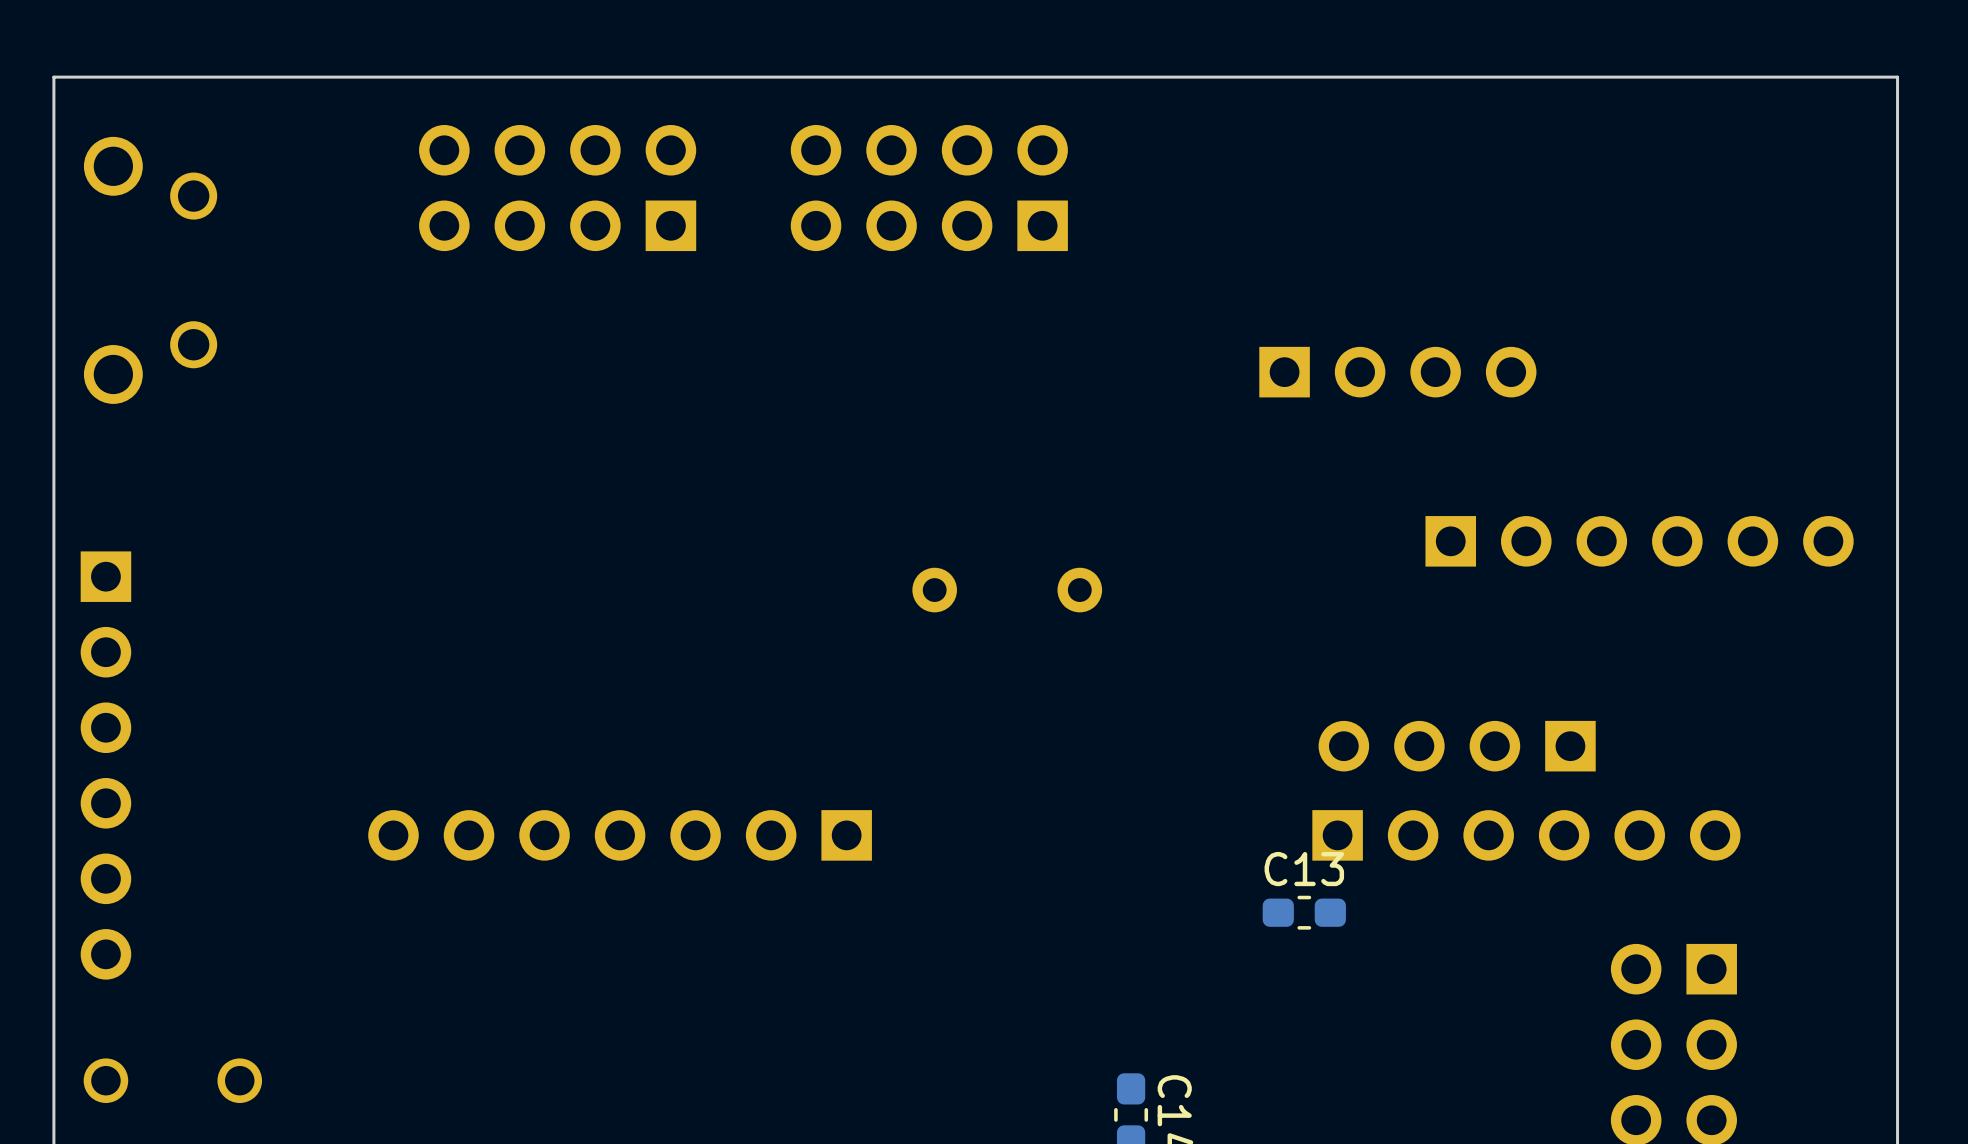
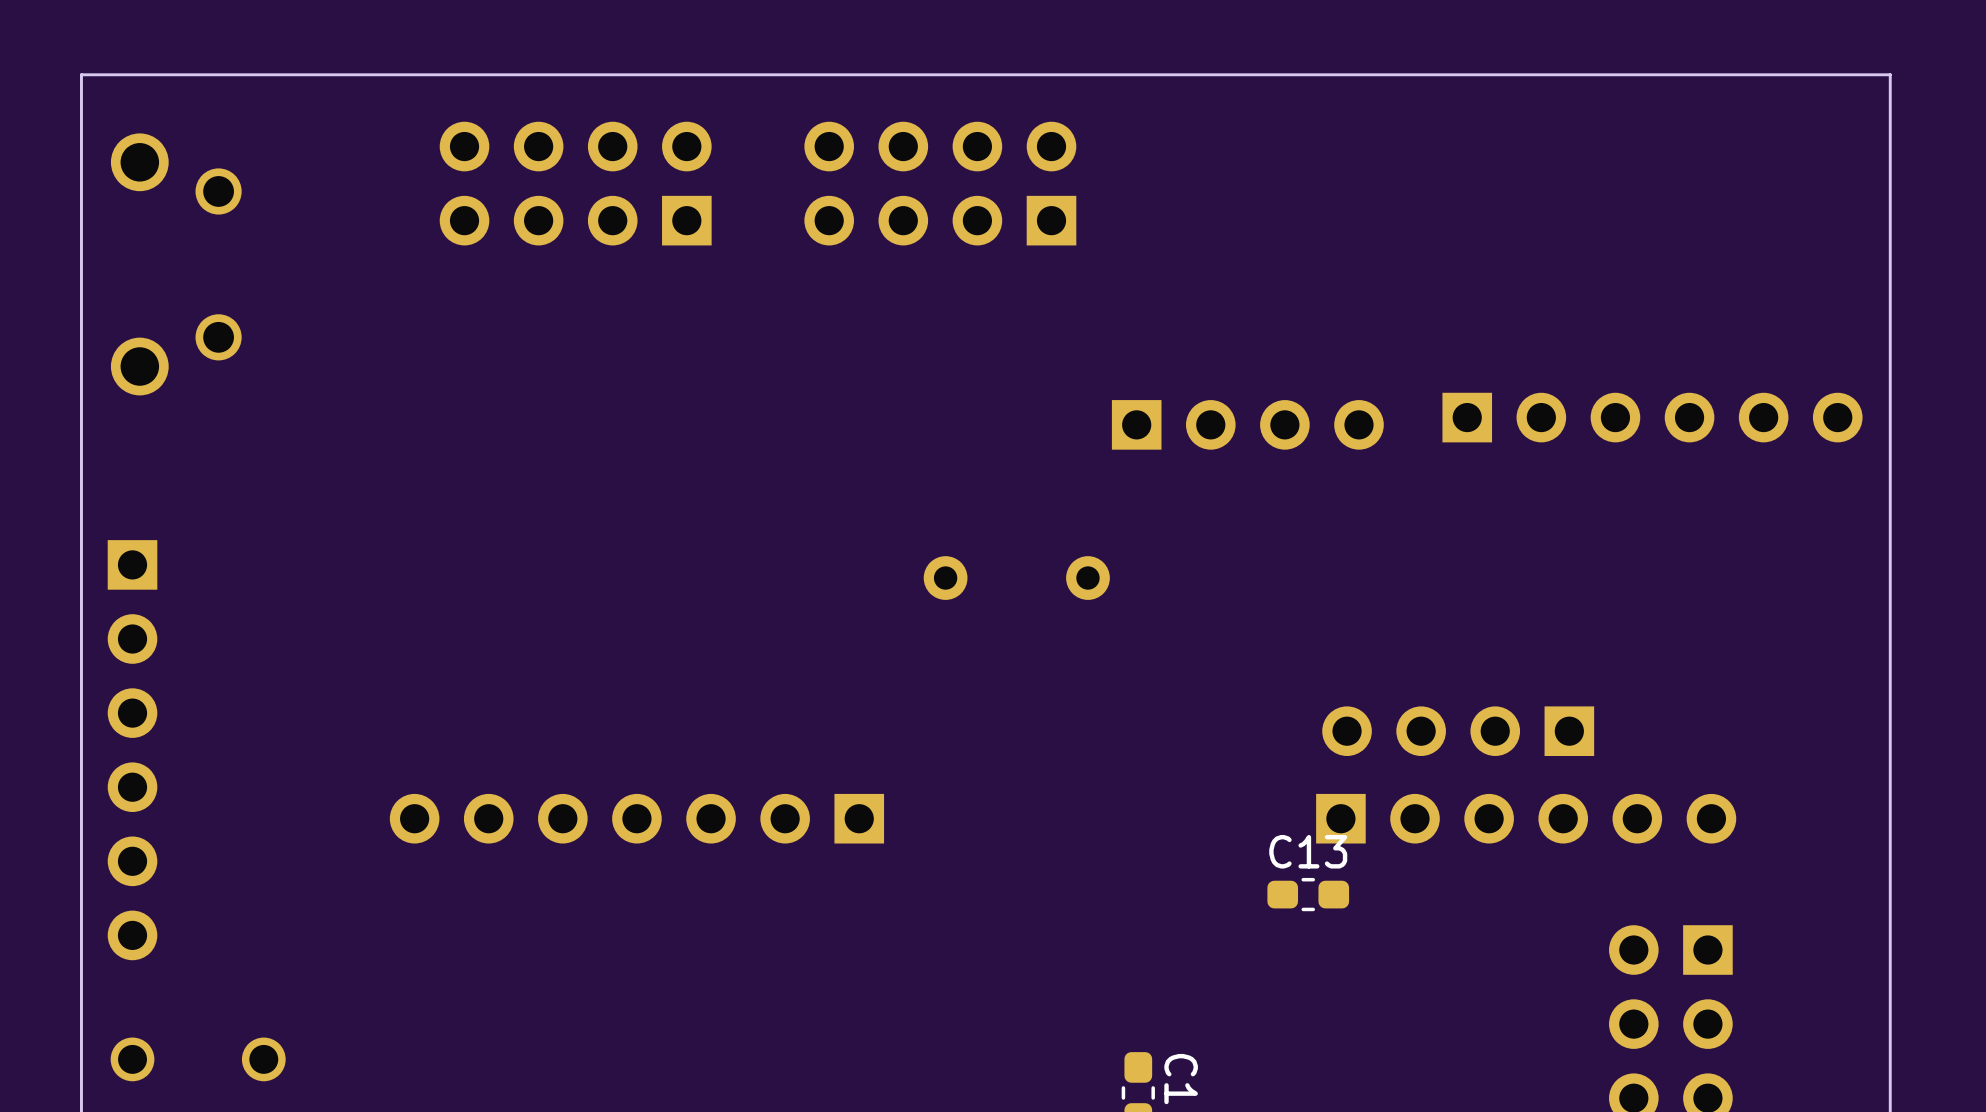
part position: (1397, 372) -> (1247, 424)
part position: (1639, 541) -> (1652, 417)

